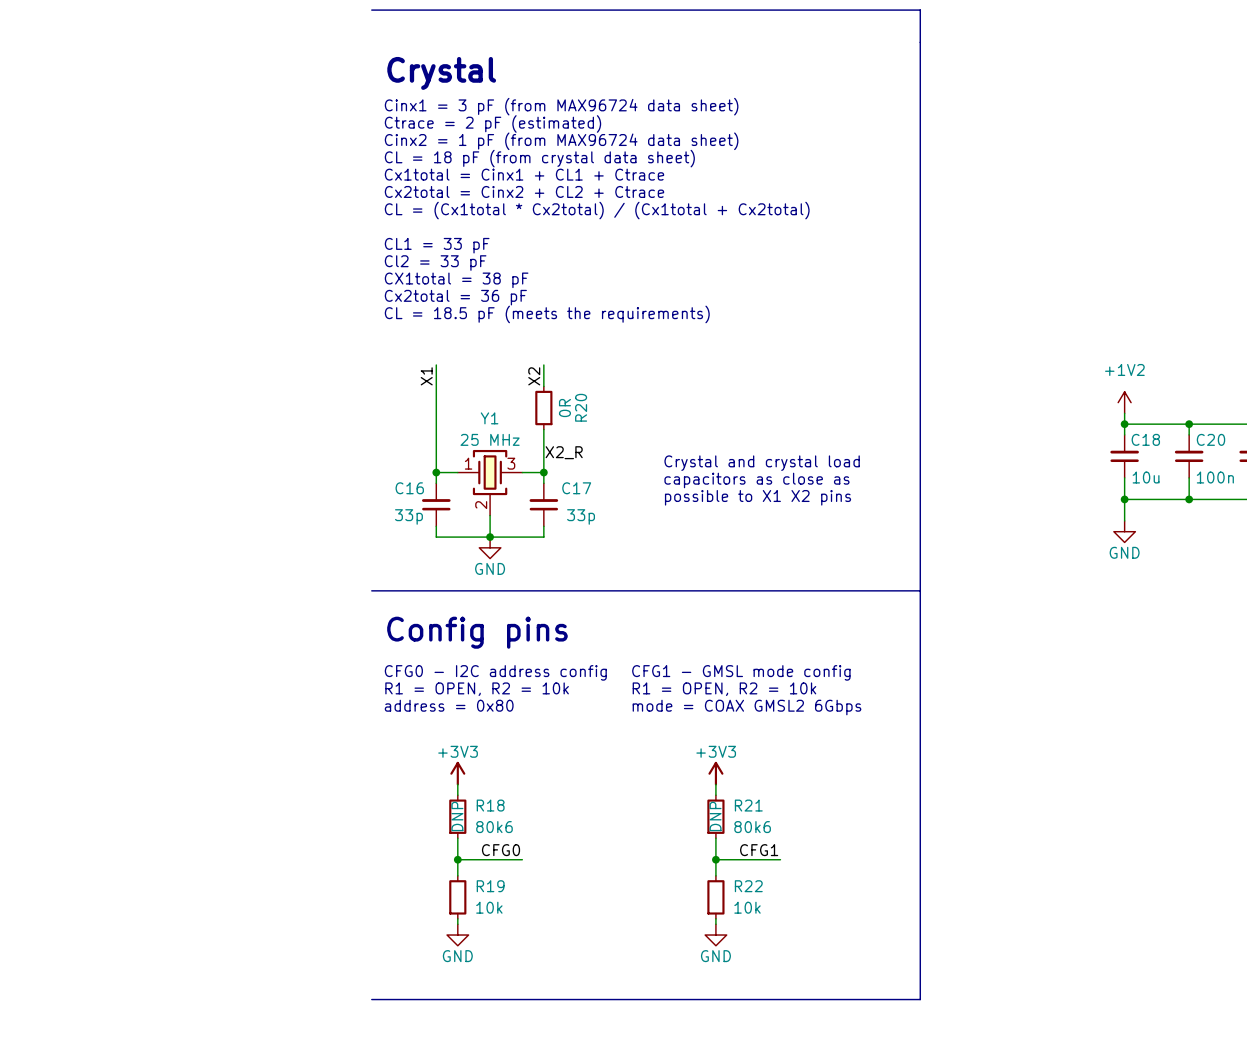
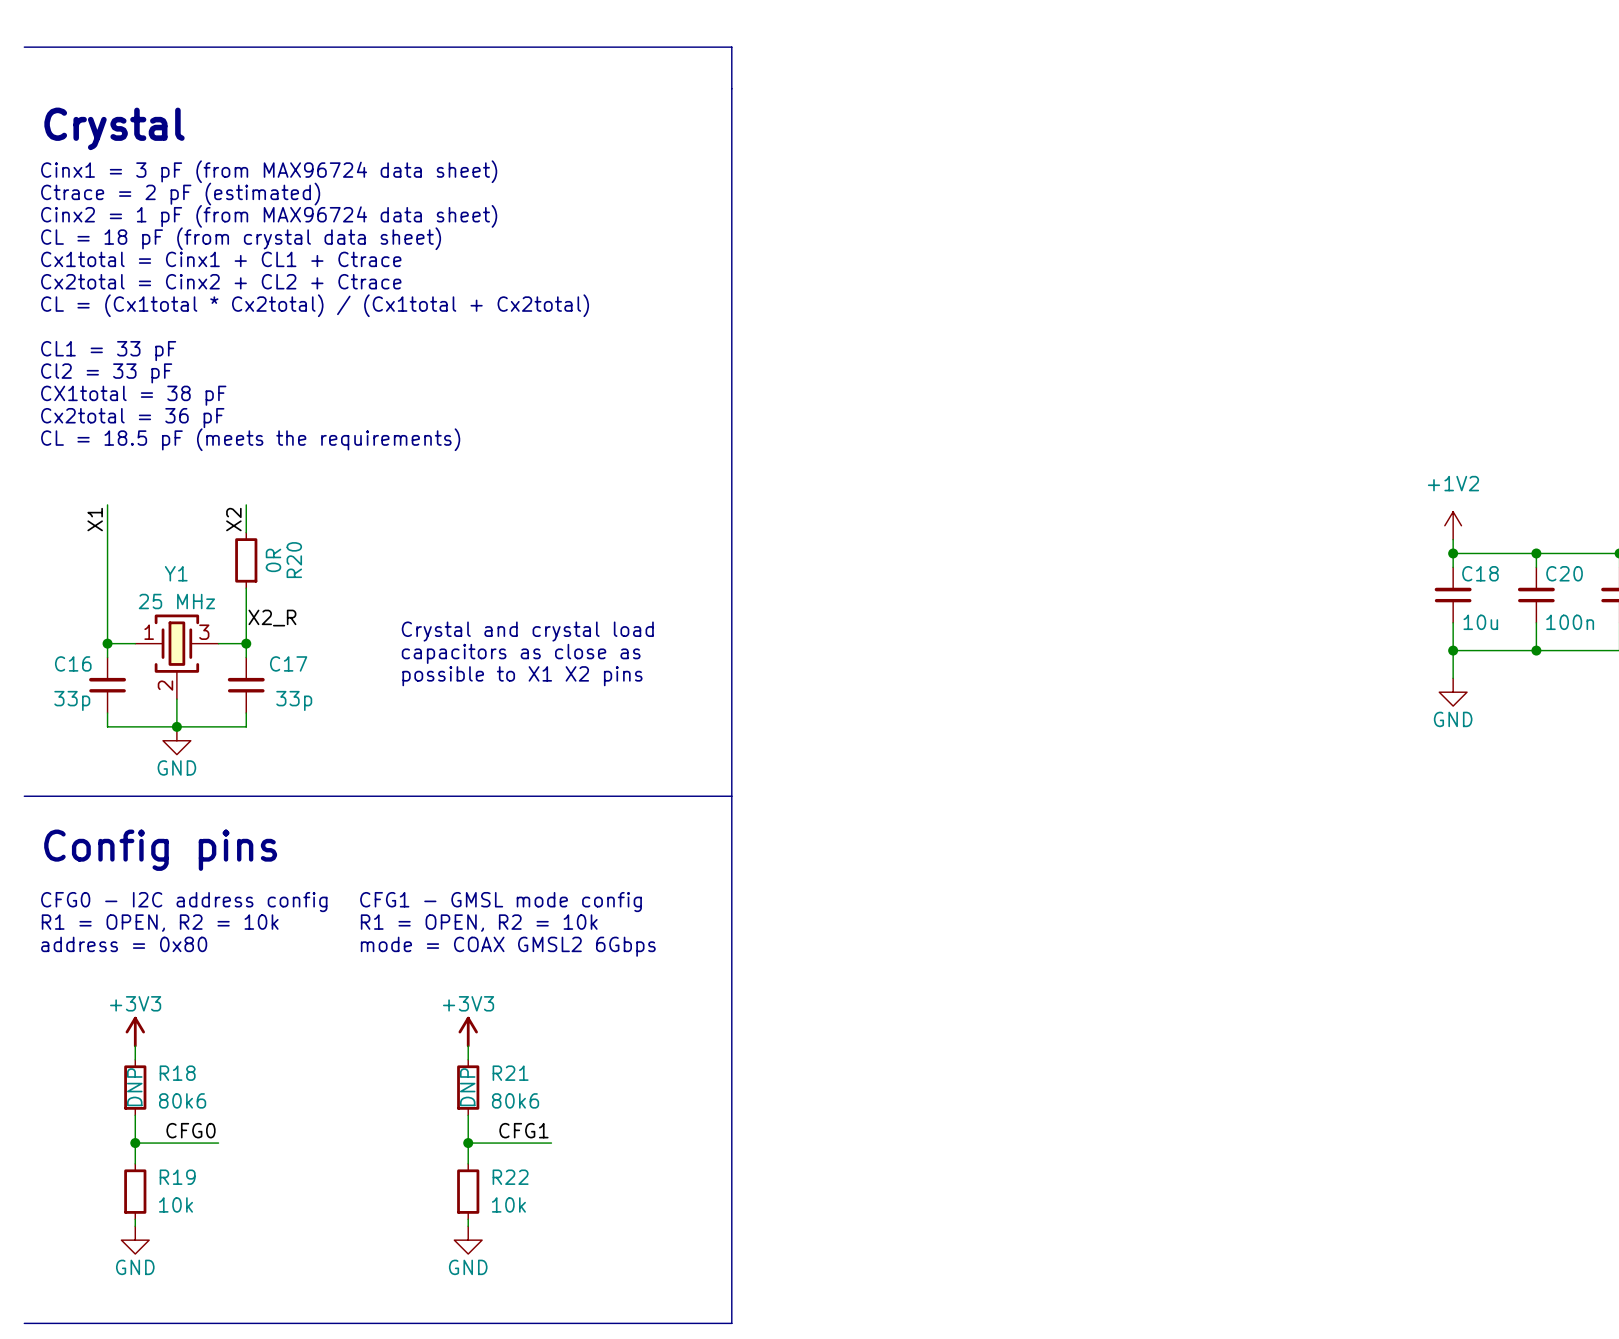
line: (371, 10) (920, 10) (920, 999) (371, 999) -> none
line: none -> (24, 47) (731, 47) (731, 1323) (24, 1323)
text: Crystal (441, 73) -> none
text: none -> Crystal (114, 128)
text: Cinx1 = 3 pF (from MAX96724 data sheet) (561, 106) -> none
text: Ctrace = 2 pF (estimated) (492, 123) -> none
text: none -> Cinx1 = 3 pF (from MAX96724 data sheet) (269, 171)
text: Cinx2 = 1 pF (from MAX96724 data sheet) (561, 141) -> none
text: none -> Ctrace = 2 pF (estimated) (180, 194)
text: CL = 18 pF (from crystal data sheet) (539, 158) -> none
text: none -> Cinx2 = 1 pF (from MAX96724 data sheet) (269, 216)
text: Cx1total = Cinx1 + CL1 + Ctrace (524, 174) -> none
text: none -> CL = 18 pF (from crystal data sheet) (241, 238)
text: Cx2total = Cinx2 + CL2 + Ctrace (524, 191) -> none
text: none -> Cx1total = Cinx1 + CL1 + Ctrace (221, 259)
text: CL = (Cx1total * Cx2total) / (Cx1total + Cx2total) (597, 210) -> none
text: none -> Cx2total = Cinx2 + CL2 + Ctrace (221, 281)
text: none -> CL = (Cx1total * Cx2total) / (Cx1total + Cx2total) (315, 305)
text: CL1 = 33 pF (437, 245) -> none
text: Cl2 = 33 pF (435, 263) -> none
text: none -> CL1 = 33 pF (108, 351)
text: CX1total = 38 pF (456, 280) -> none
text: none -> Cl2 = 33 pF (106, 373)
text: Cx2total = 36 pF (455, 297) -> none
text: none -> CX1total = 38 pF (133, 395)
text: CL = 18.5 pF (meets the requirements) (547, 314) -> none
text: none -> Cx2total = 36 pF (132, 418)
text: none -> CL = 18.5 pF (meets the requirements) (250, 439)
wire: (436, 364) (436, 483) -> none
wire: (543, 364) (543, 386) -> none
label: X1 (426, 376) -> none
label: X2 (534, 376) -> none
wire: none -> (107, 504) (107, 657)
wire: none -> (246, 504) (246, 532)
label: none -> X1 (95, 519)
label: none -> X2 (233, 519)
R20 position: (543, 408) -> (246, 560)
wire: (543, 429) (543, 483) -> none
wire: none -> (246, 588) (246, 657)
label: X2_R (564, 452) -> none
text: Crystal and crystal load (762, 463) -> none
wire: (436, 472) (457, 472) -> none
junction: (436, 472) -> none
wire: (522, 472) (543, 472) -> none
junction: (543, 472) -> none
label: none -> X2_R (272, 618)
text: capacitors as close as (756, 480) -> none
Y1 position: (490, 482) -> (176, 656)
text: none -> Crystal and crystal load (527, 631)
wire: none -> (107, 643) (135, 643)
junction: none -> (107, 643)
wire: none -> (218, 643) (246, 643)
junction: none -> (246, 643)
text: possible to X1 X2 pins (758, 497) -> none
text: none -> capacitors as close as (521, 653)
C16 position: (436, 504) -> (107, 685)
C17 position: (543, 504) -> (246, 685)
wire: (490, 515) (490, 537) -> none
text: none -> possible to X1 X2 pins (522, 676)
wire: (436, 526) (436, 537) (543, 537) (543, 526) -> none
wire: none -> (176, 699) (176, 726)
junction: (490, 537) -> none
wire: none -> (107, 713) (107, 726) (246, 726) (246, 713)
power symbol: GND (490, 547) -> none
junction: none -> (176, 726)
power symbol: none -> GND (176, 740)
line: (371, 590) (920, 590) -> none
line: none -> (24, 796) (731, 796)
text: Config pins (477, 632) -> none
text: none -> Config pins (160, 850)
text: CFG0 - I2C address config (495, 672) -> CFG1 - GMSL mode config (501, 902)
text: CFG1 - GMSL mode config (741, 672) -> none
text position: R1 = OPEN, R2 = 10k (477, 689) -> R1 = OPEN, R2 = 10k (479, 923)
text: R1 = OPEN, R2 = 10k (724, 689) -> none
text: none -> CFG0 - I2C address config (184, 902)
text: address = 0x80 (449, 705) -> none
text: mode = COAX GMSL2 6Gbps (747, 707) -> none
text: none -> R1 = OPEN, R2 = 10k (160, 923)
text: none -> address = 0x80 (124, 944)
text: none -> mode = COAX GMSL2 6Gbps (508, 946)
power symbol position: +3V3 (457, 773) -> +3V3 (468, 1032)
power symbol: +3V3 (715, 773) -> none
wire: (457, 784) (457, 795) -> (468, 1045) (468, 1059)
wire: (715, 784) (715, 795) -> none
power symbol: none -> +3V3 (135, 1032)
wire: none -> (135, 1045) (135, 1059)
R18 position: (457, 816) -> (135, 1087)
R21 position: (715, 816) -> (468, 1087)
wire: (457, 838) (457, 875) -> (468, 1115) (468, 1163)
wire: (715, 838) (715, 875) -> none
label: CFG0 (501, 850) -> none
label: CFG1 (759, 850) -> none
wire: none -> (135, 1115) (135, 1163)
wire: (457, 859) (522, 859) -> (468, 1143) (551, 1143)
junction: (457, 859) -> none
wire: (715, 859) (780, 859) -> none
junction: (715, 859) -> none
label: none -> CFG0 (191, 1130)
label: none -> CFG1 (523, 1130)
wire: none -> (135, 1143) (218, 1143)
junction: none -> (135, 1143)
junction: none -> (468, 1143)
R19 position: (457, 897) -> (135, 1191)
R22 position: (715, 897) -> (468, 1191)
wire: (457, 918) (457, 924) -> (468, 1219) (468, 1226)
wire: (715, 918) (715, 924) -> none
power symbol position: GND (457, 935) -> GND (468, 1240)
power symbol: GND (715, 935) -> none
wire: none -> (135, 1219) (135, 1226)
power symbol: none -> GND (135, 1240)

